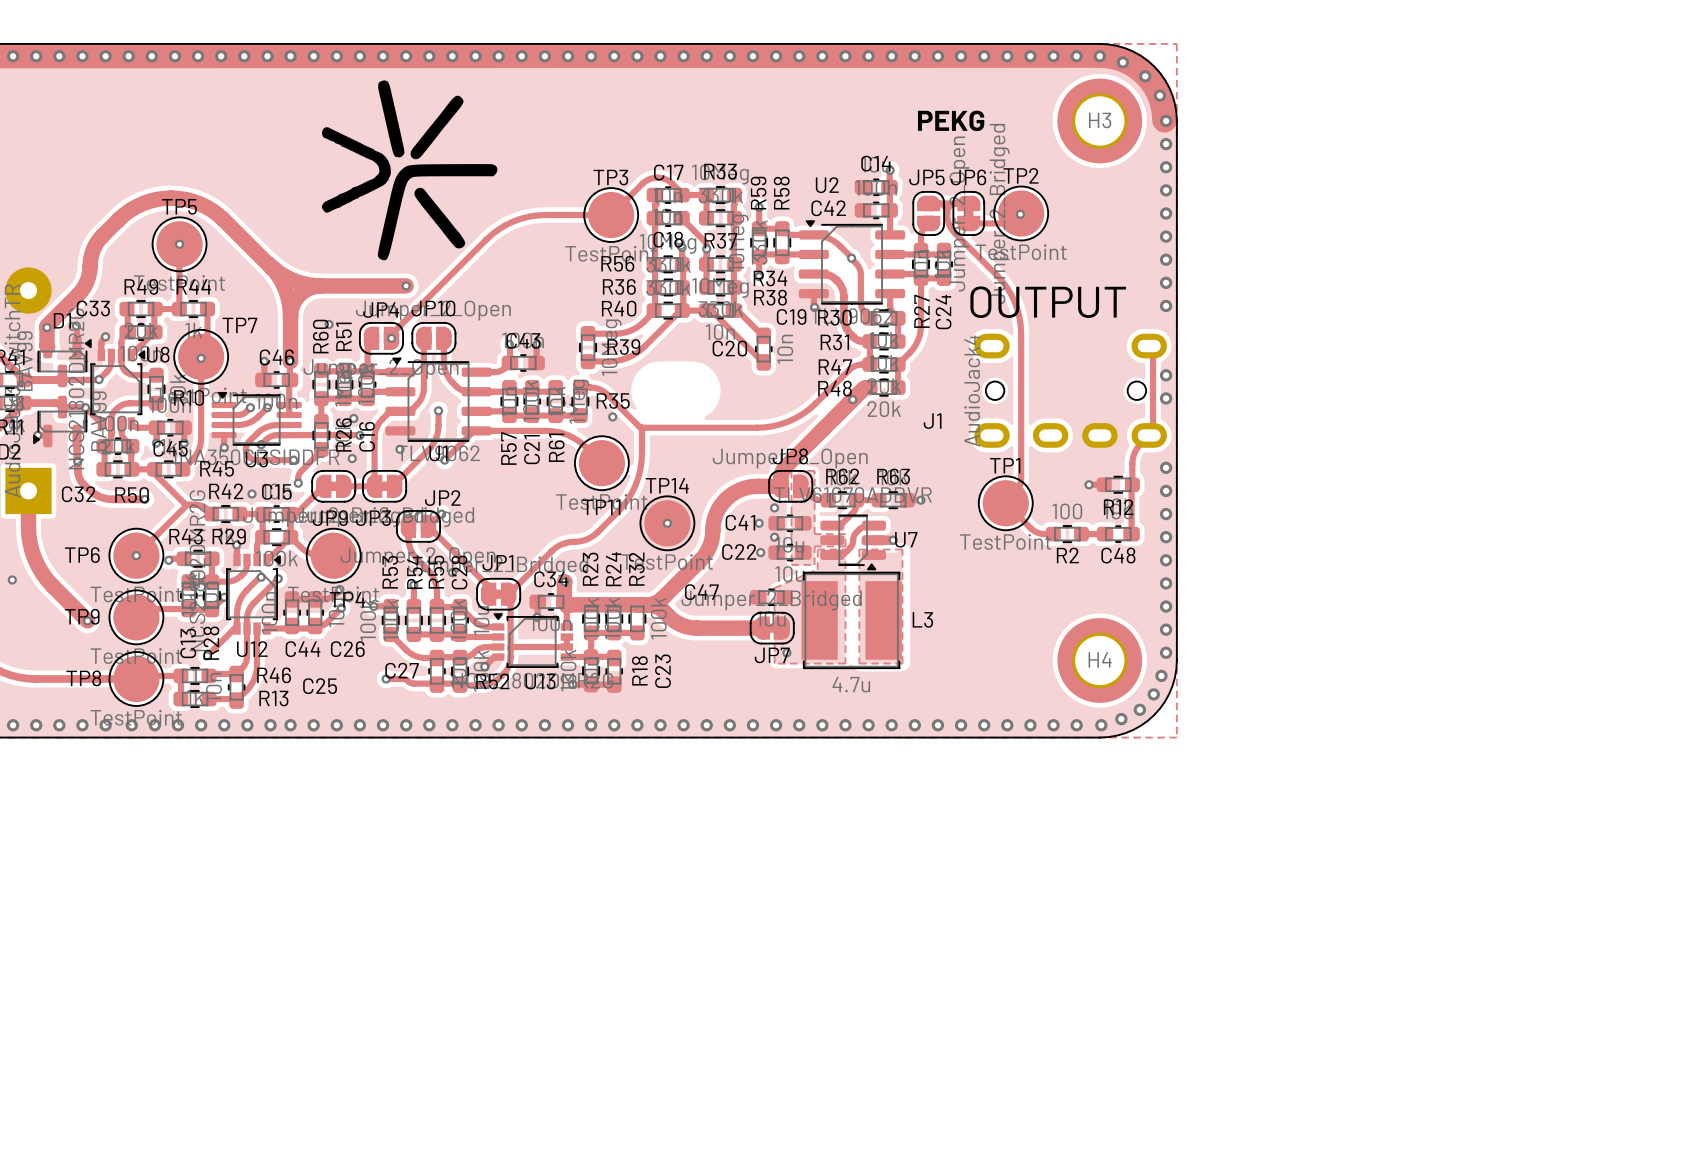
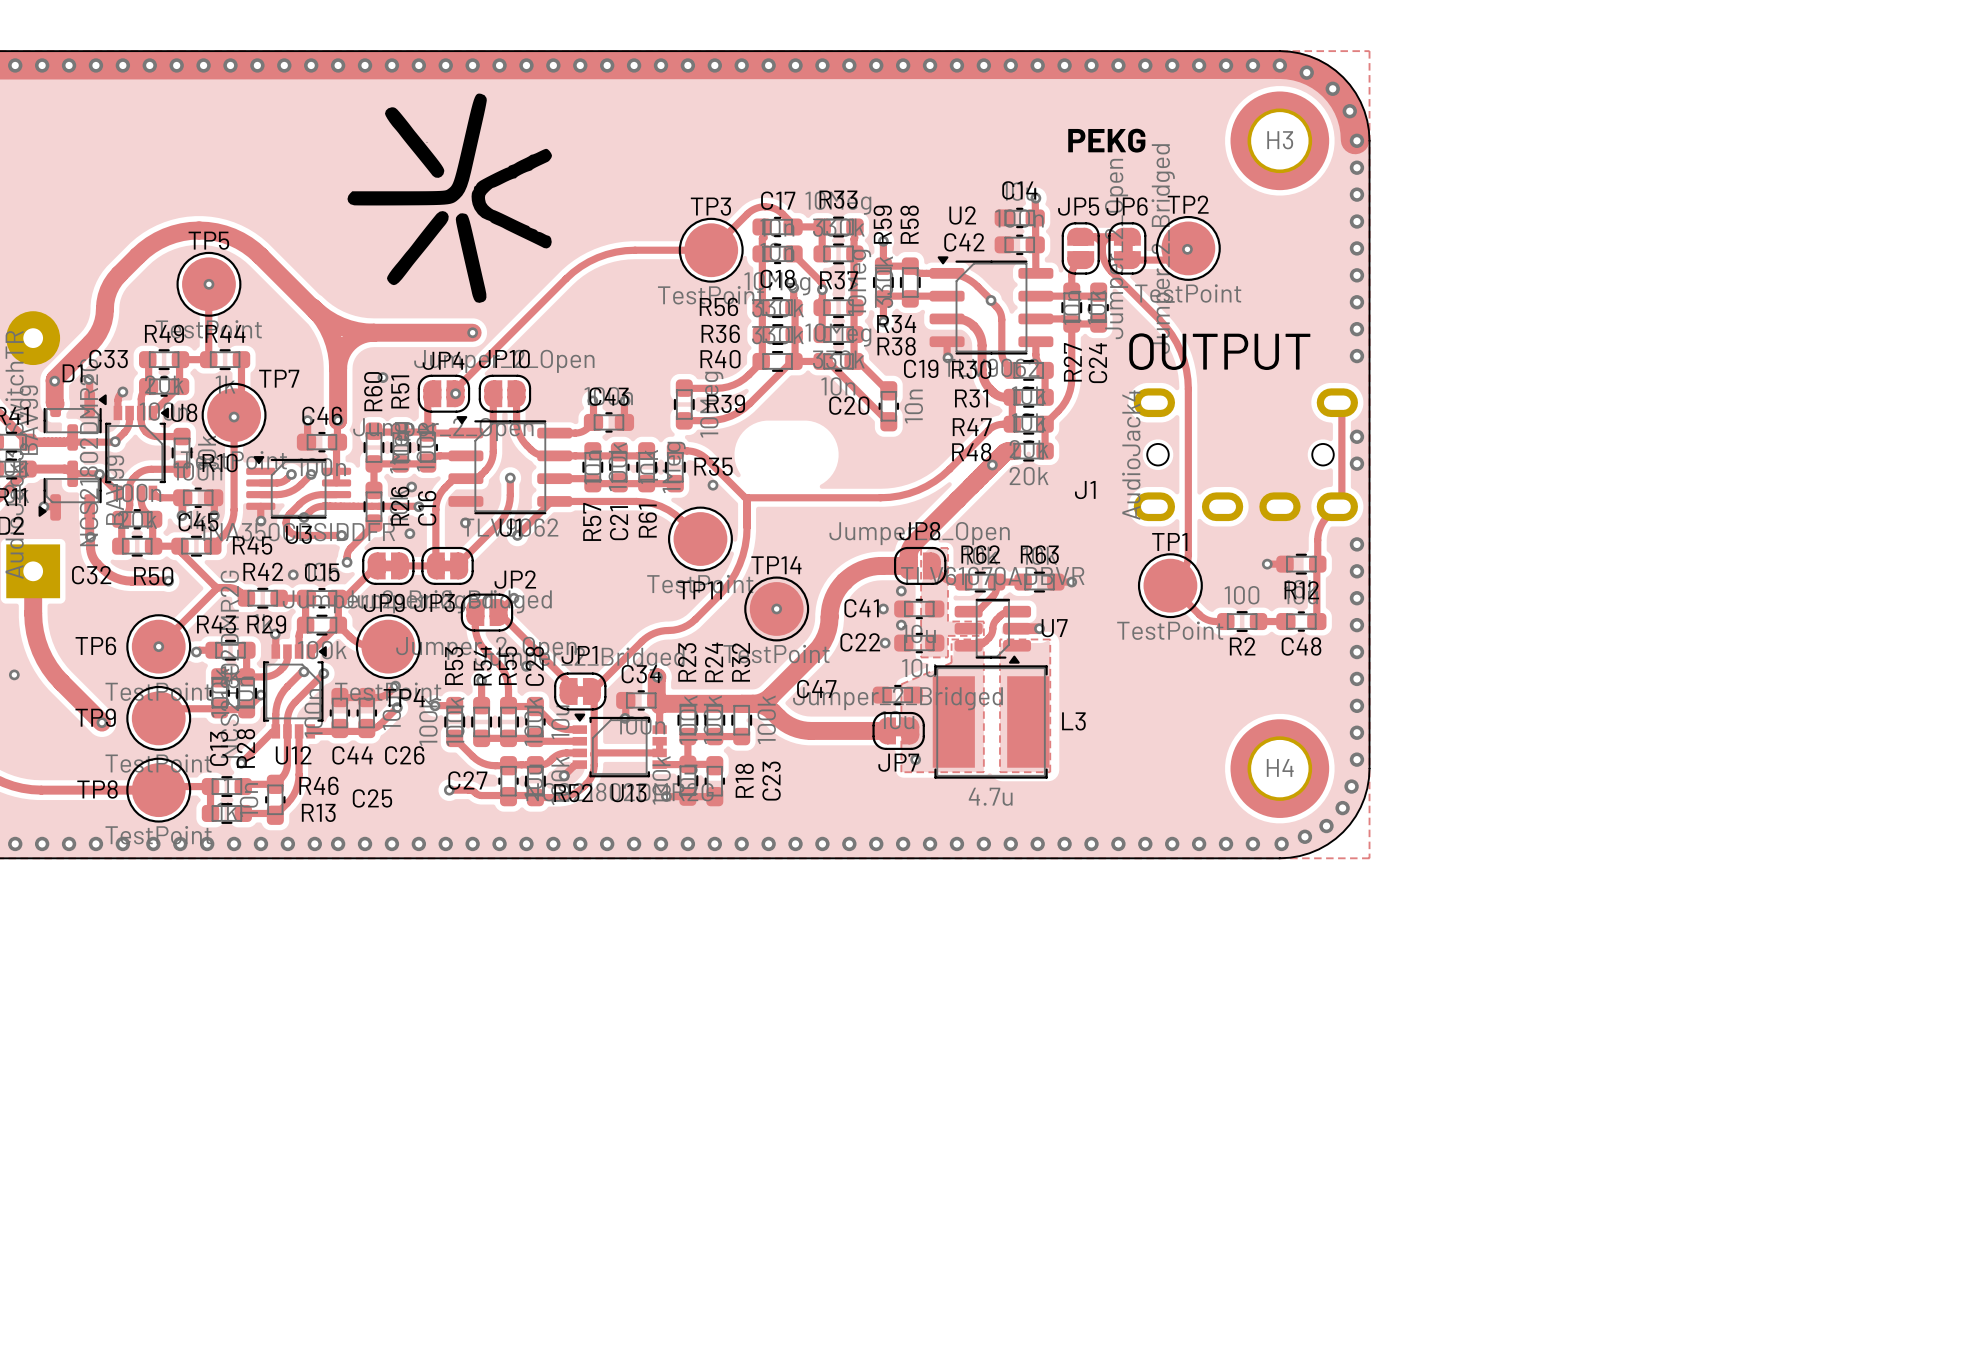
drawing: none -> [347, 93, 552, 303]
drawing: [321, 80, 498, 261] -> none

